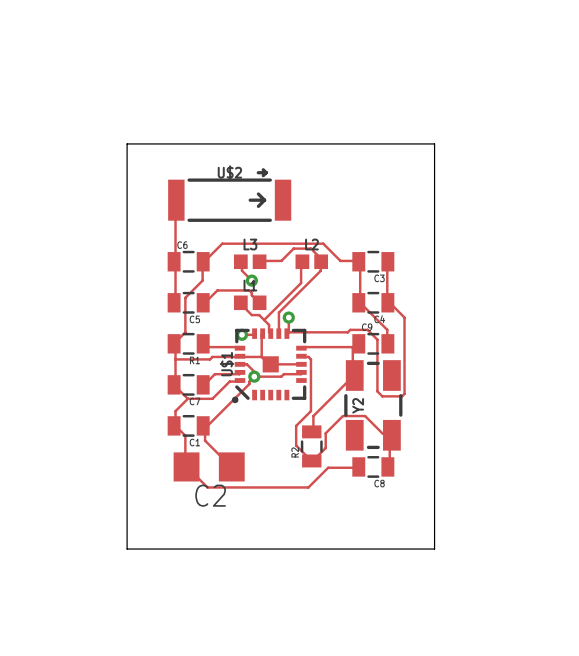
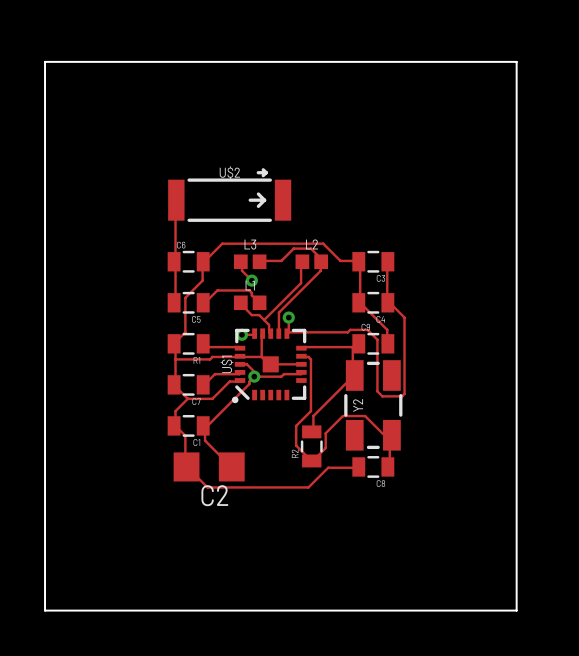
board edge: none -> (45, 61) (516, 61) (516, 610) (45, 610) (45, 61)
board edge: (127, 143) (434, 143) (434, 549) (127, 549) (127, 143) -> none

